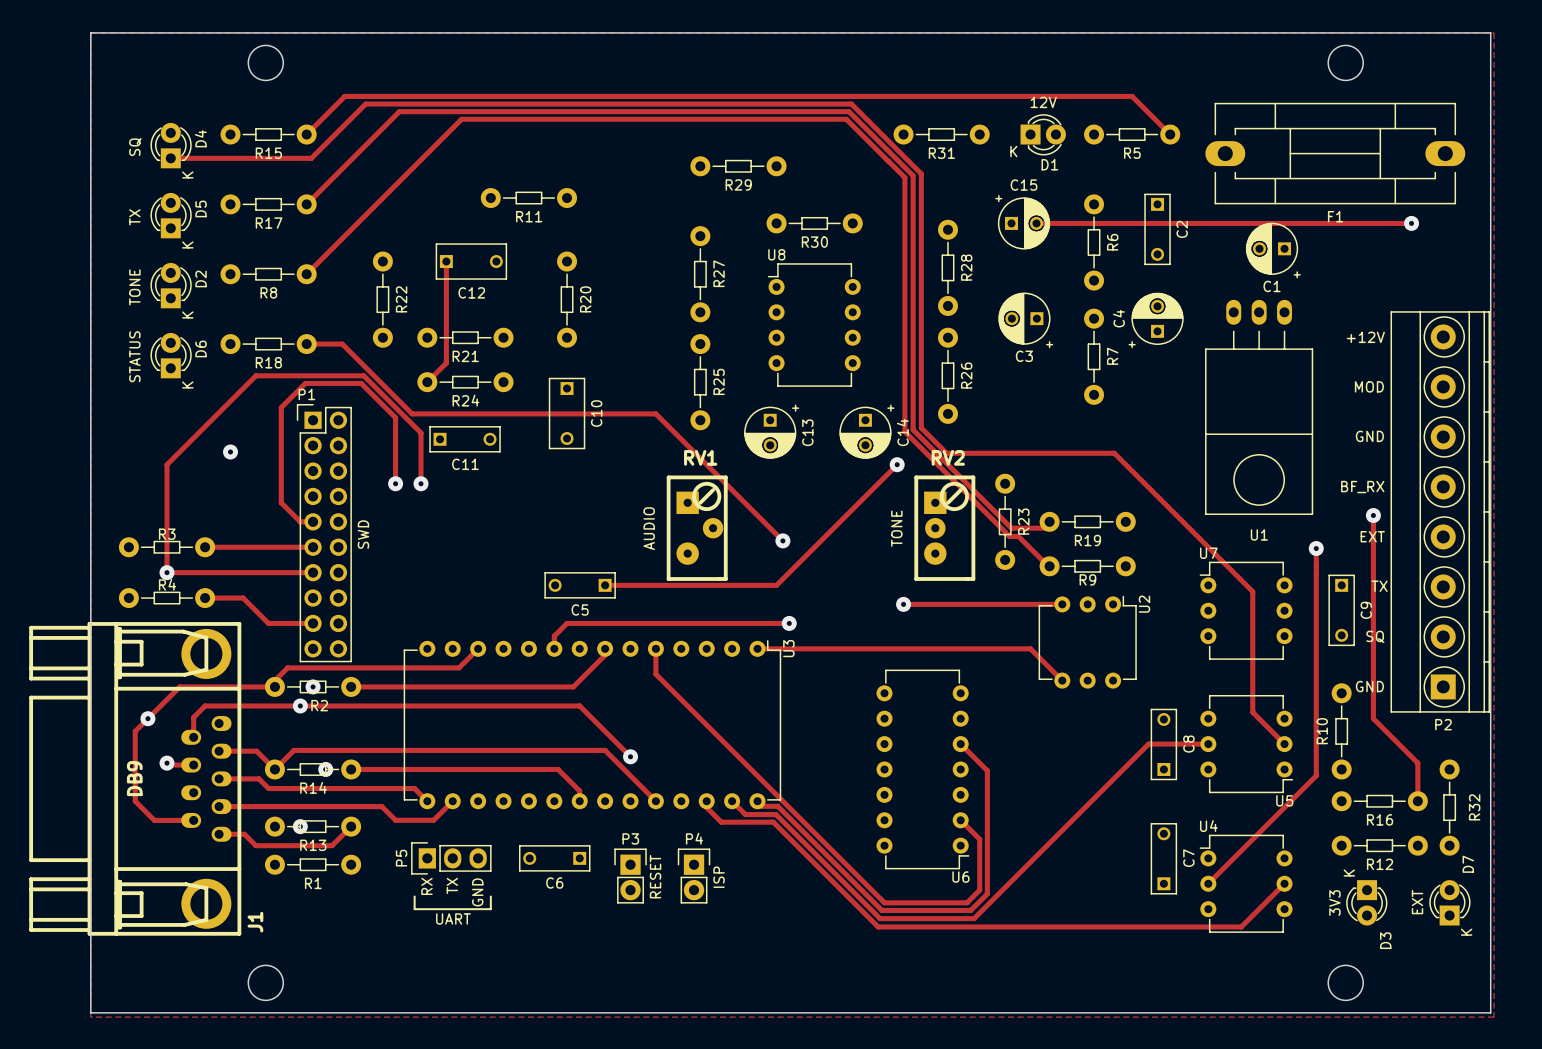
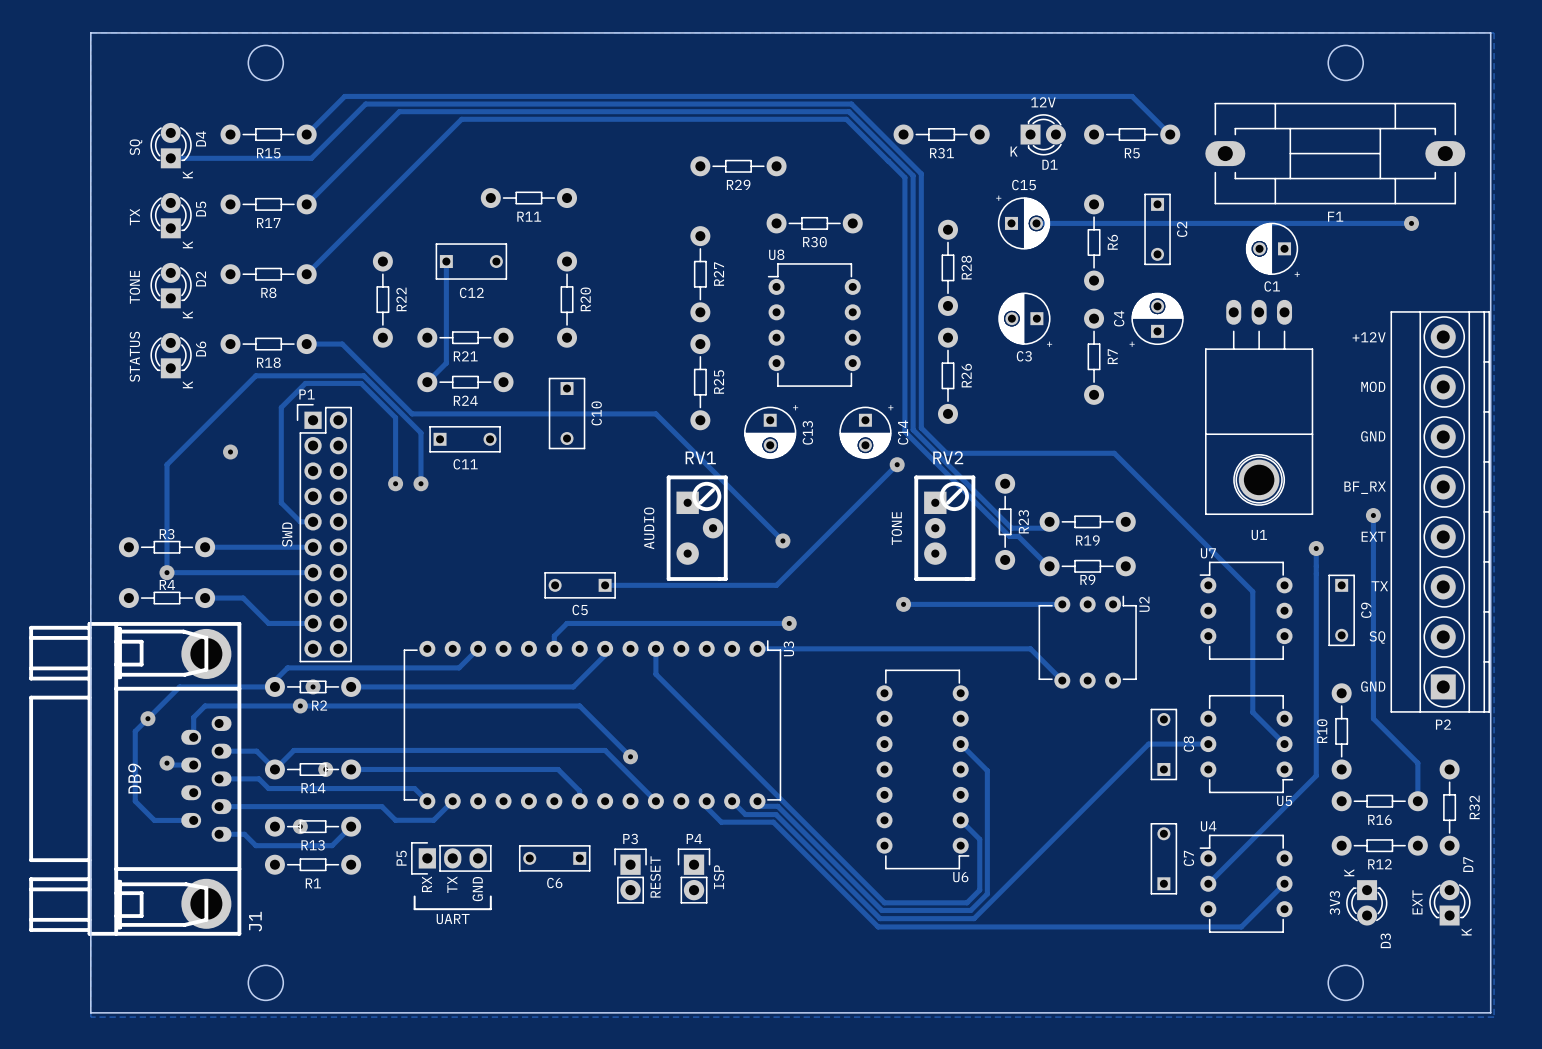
part: none -> (1259, 479)
text position: SWD (363, 534) -> SWD (287, 534)

